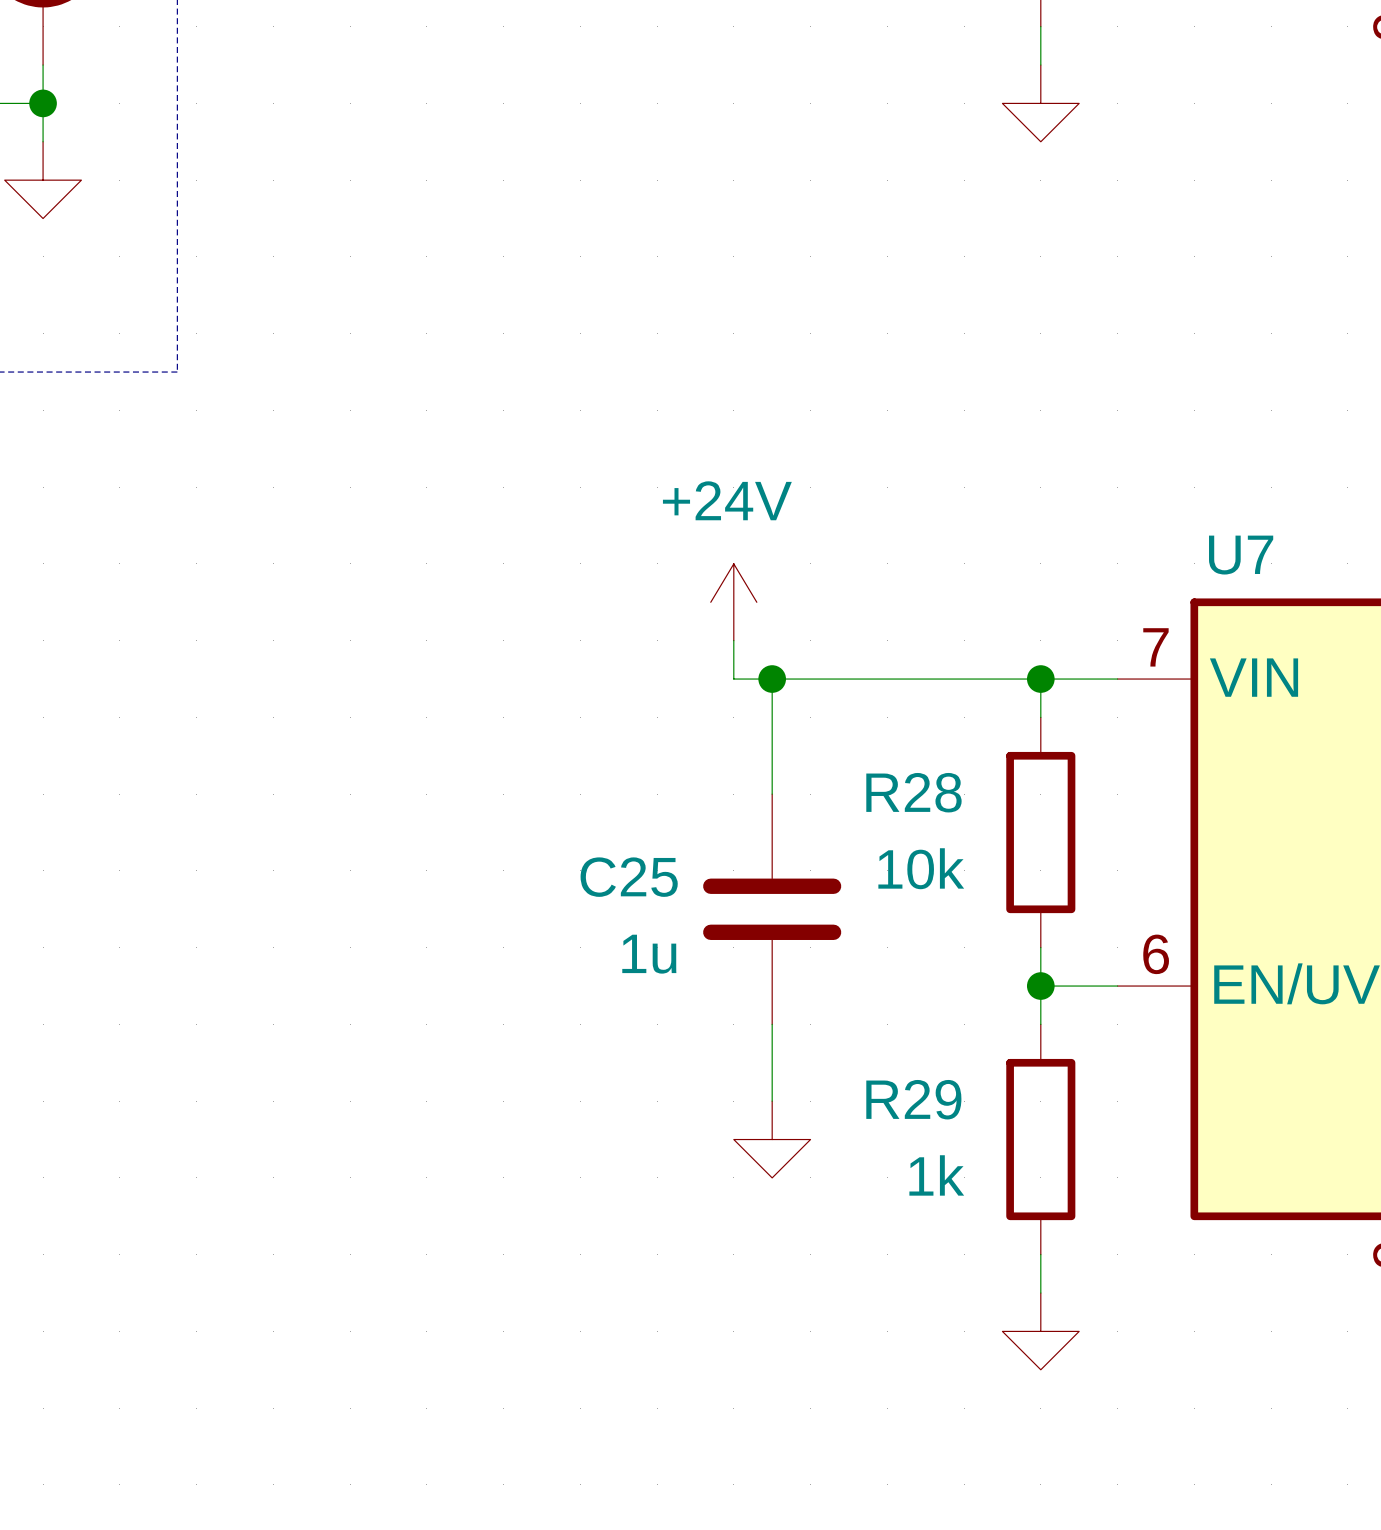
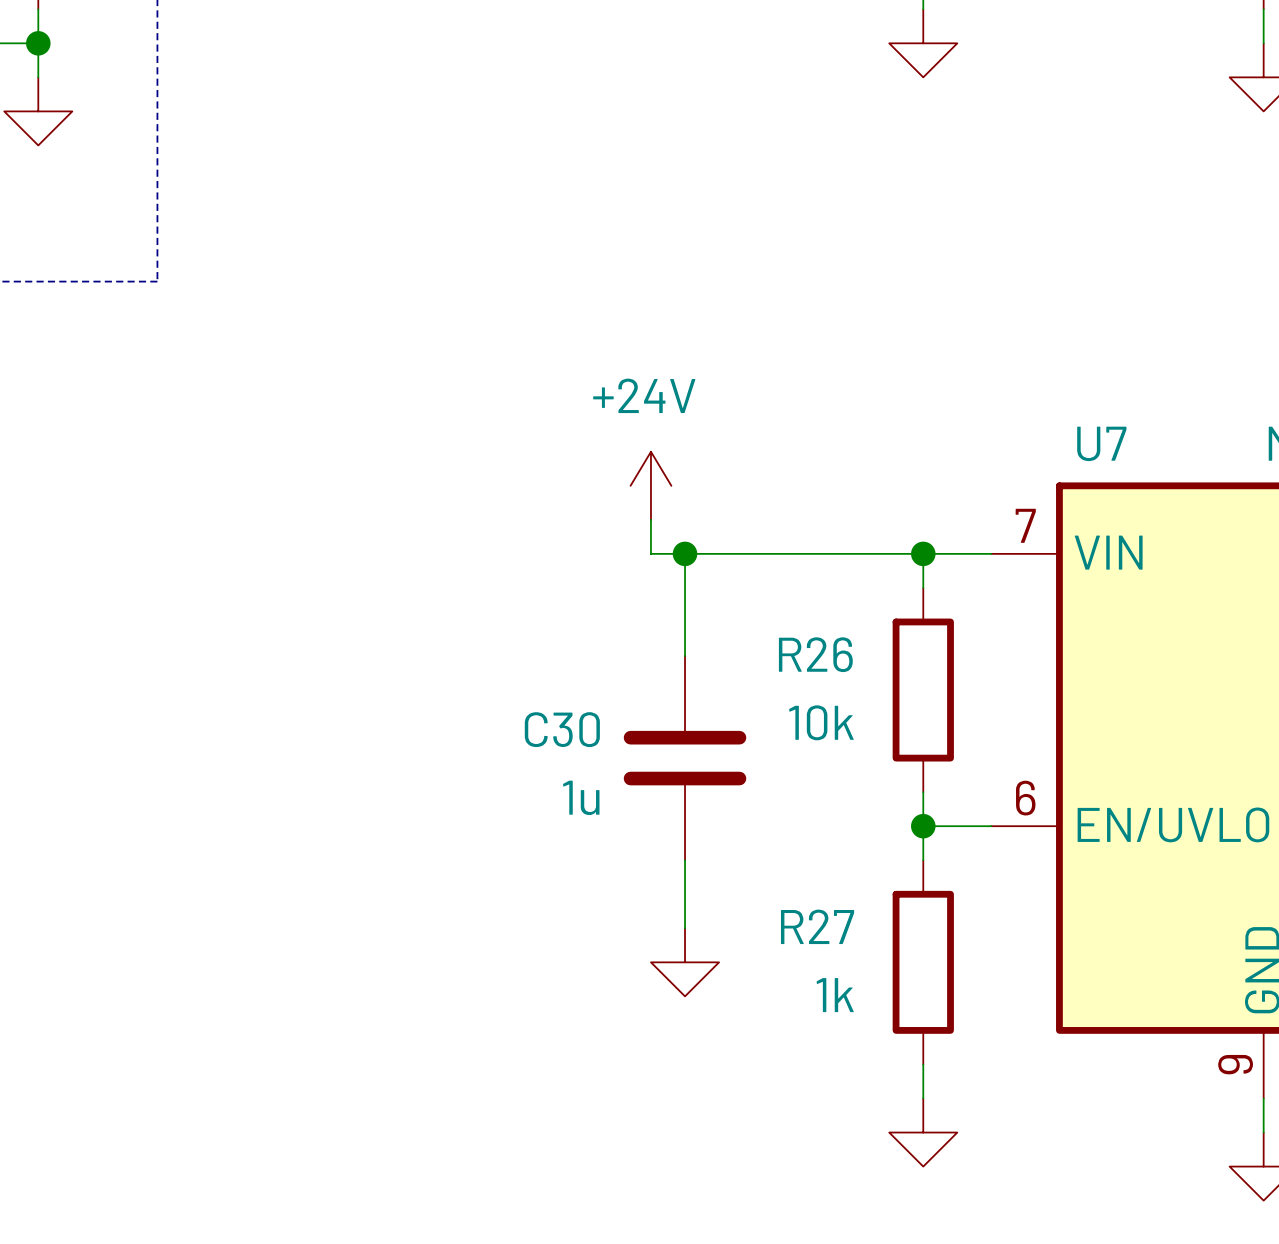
R28 name: R28 (913, 792) -> R26 (815, 654)
C25 name: C25 (629, 877) -> C30 (562, 729)
R29 name: R29 (913, 1099) -> R27 (817, 926)

